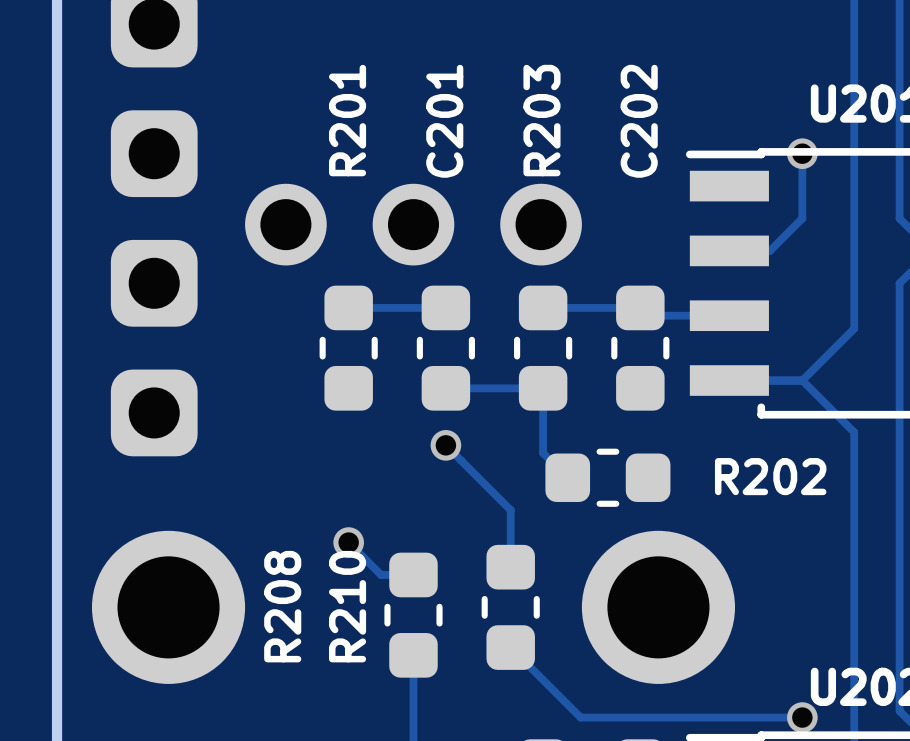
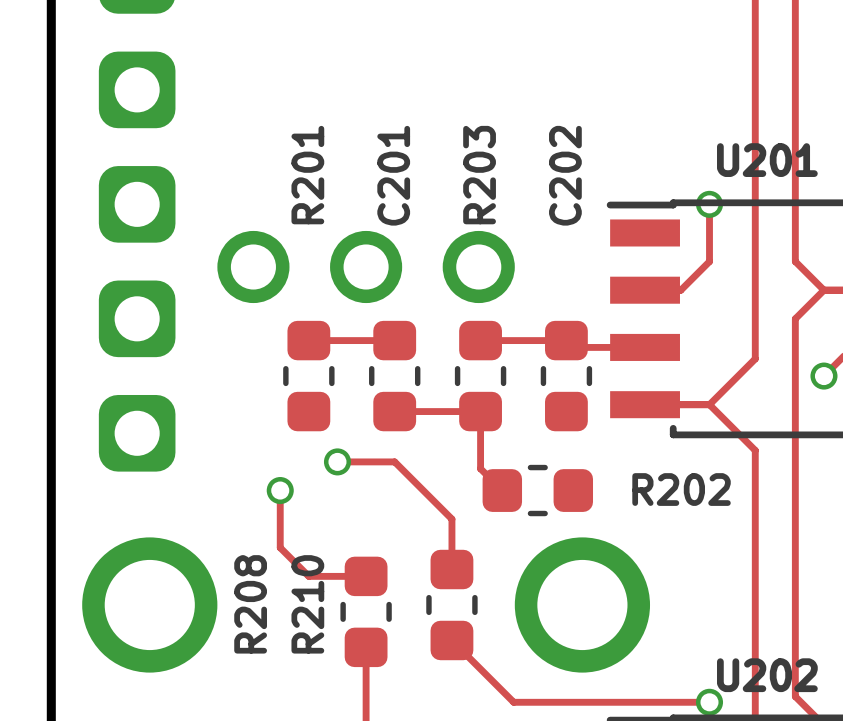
track: none -> (337, 461) (394, 461)
via: none -> (337, 461)
via: (445, 445) -> none
via: none -> (280, 490)
track: (348, 542) (381, 574) -> (280, 490) (280, 547) (308, 576) (337, 576)
via: (348, 542) -> none

